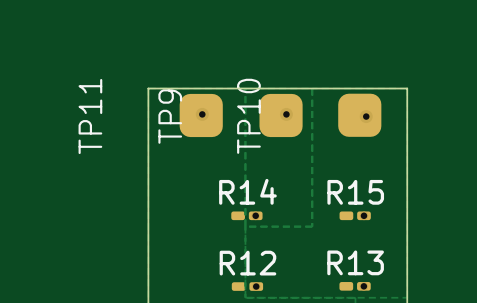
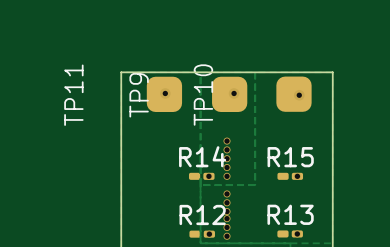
via: none -> (227, 141)
via: none -> (227, 149)
via: none -> (227, 158)
via: none -> (227, 167)
via: none -> (227, 176)
via: none -> (227, 193)
via: none -> (227, 202)
via: none -> (227, 211)
via: none -> (227, 218)
via: none -> (227, 227)
via: none -> (227, 236)

